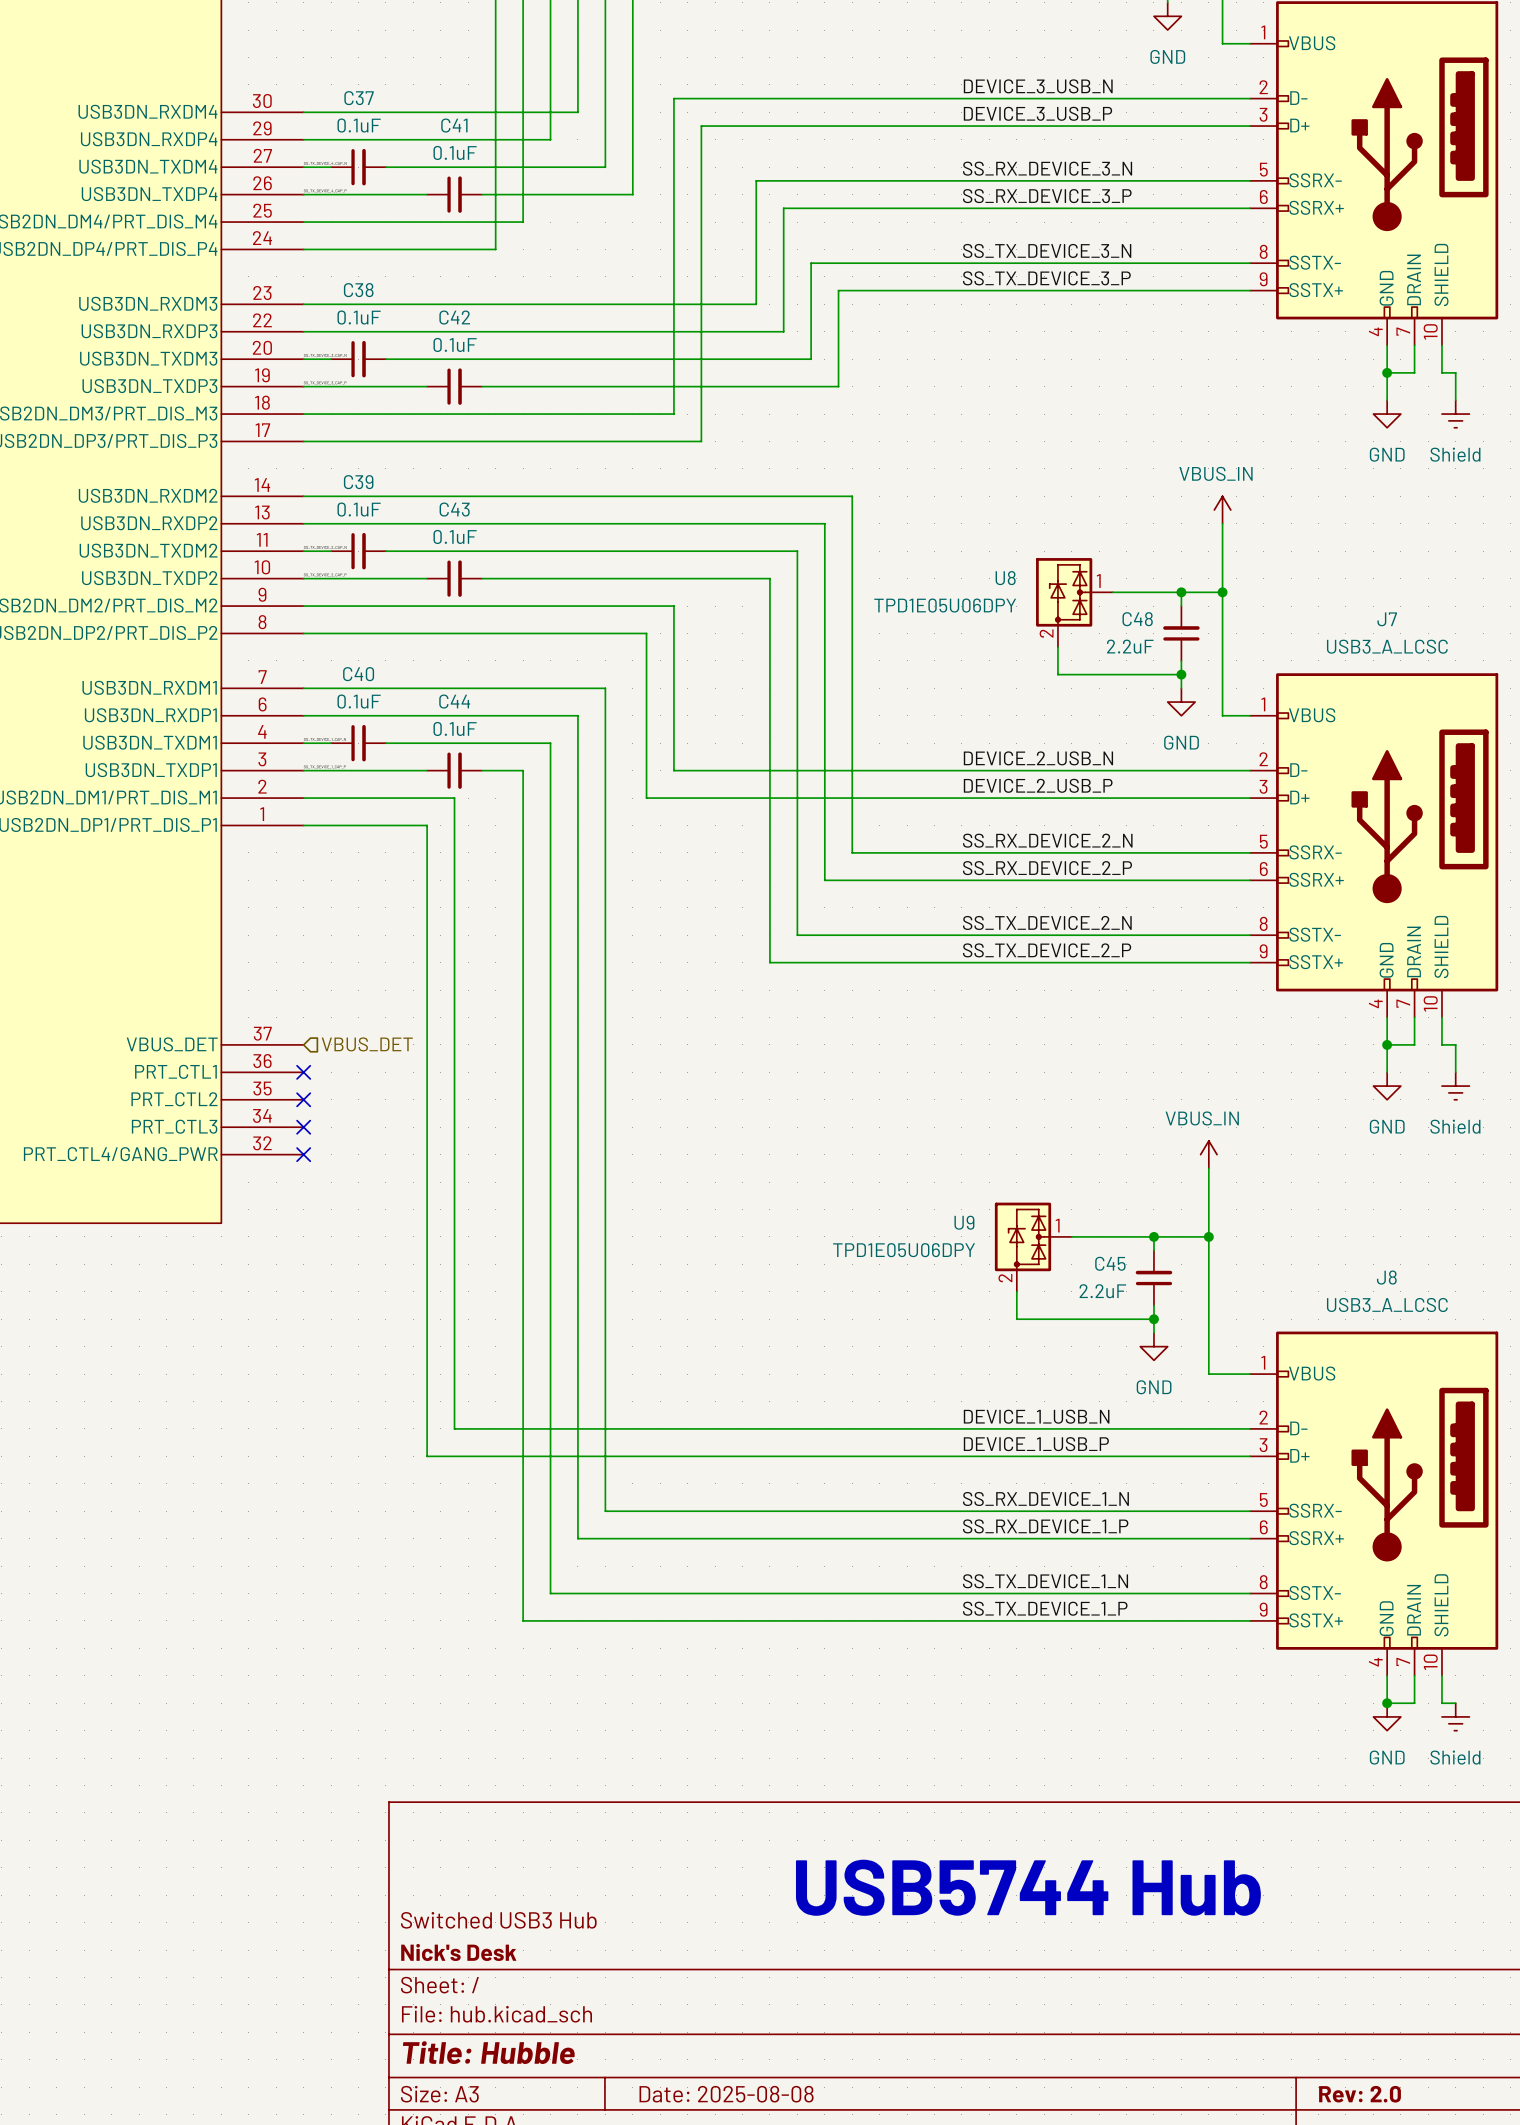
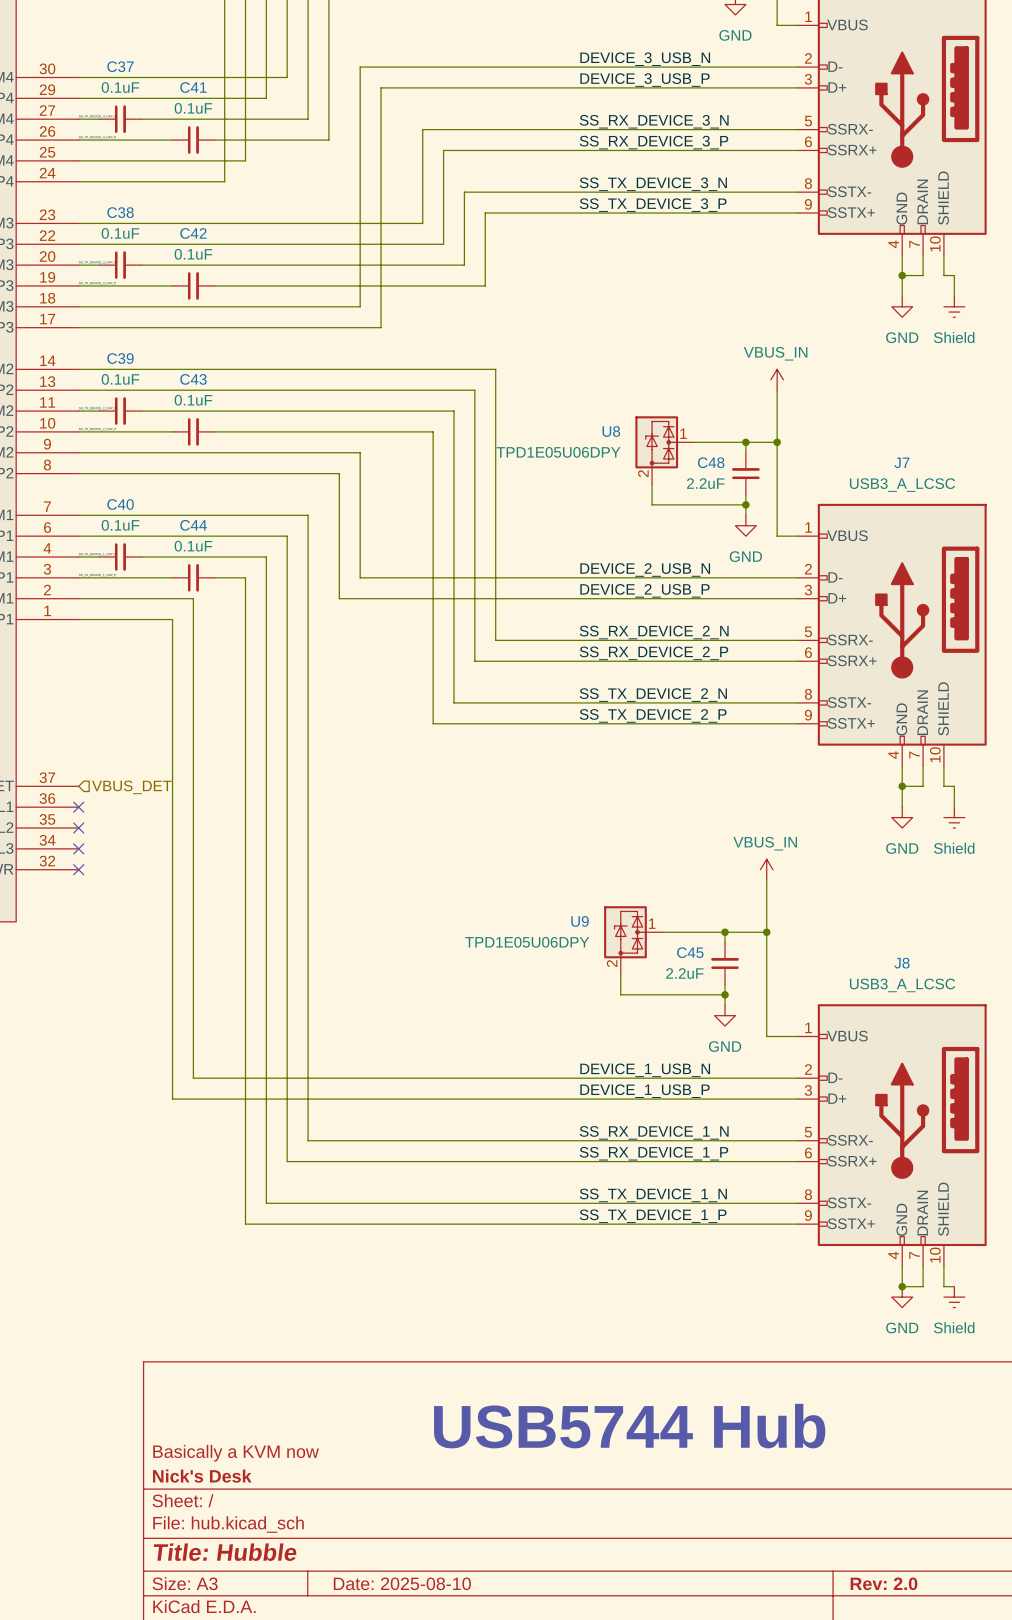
title block: Switched USB3 Hub (498, 1920) -> Basically a KVM now (236, 1453)
title block: Date: 2025-08-08 (726, 2094) -> Date: 2025-08-10 (402, 1583)

